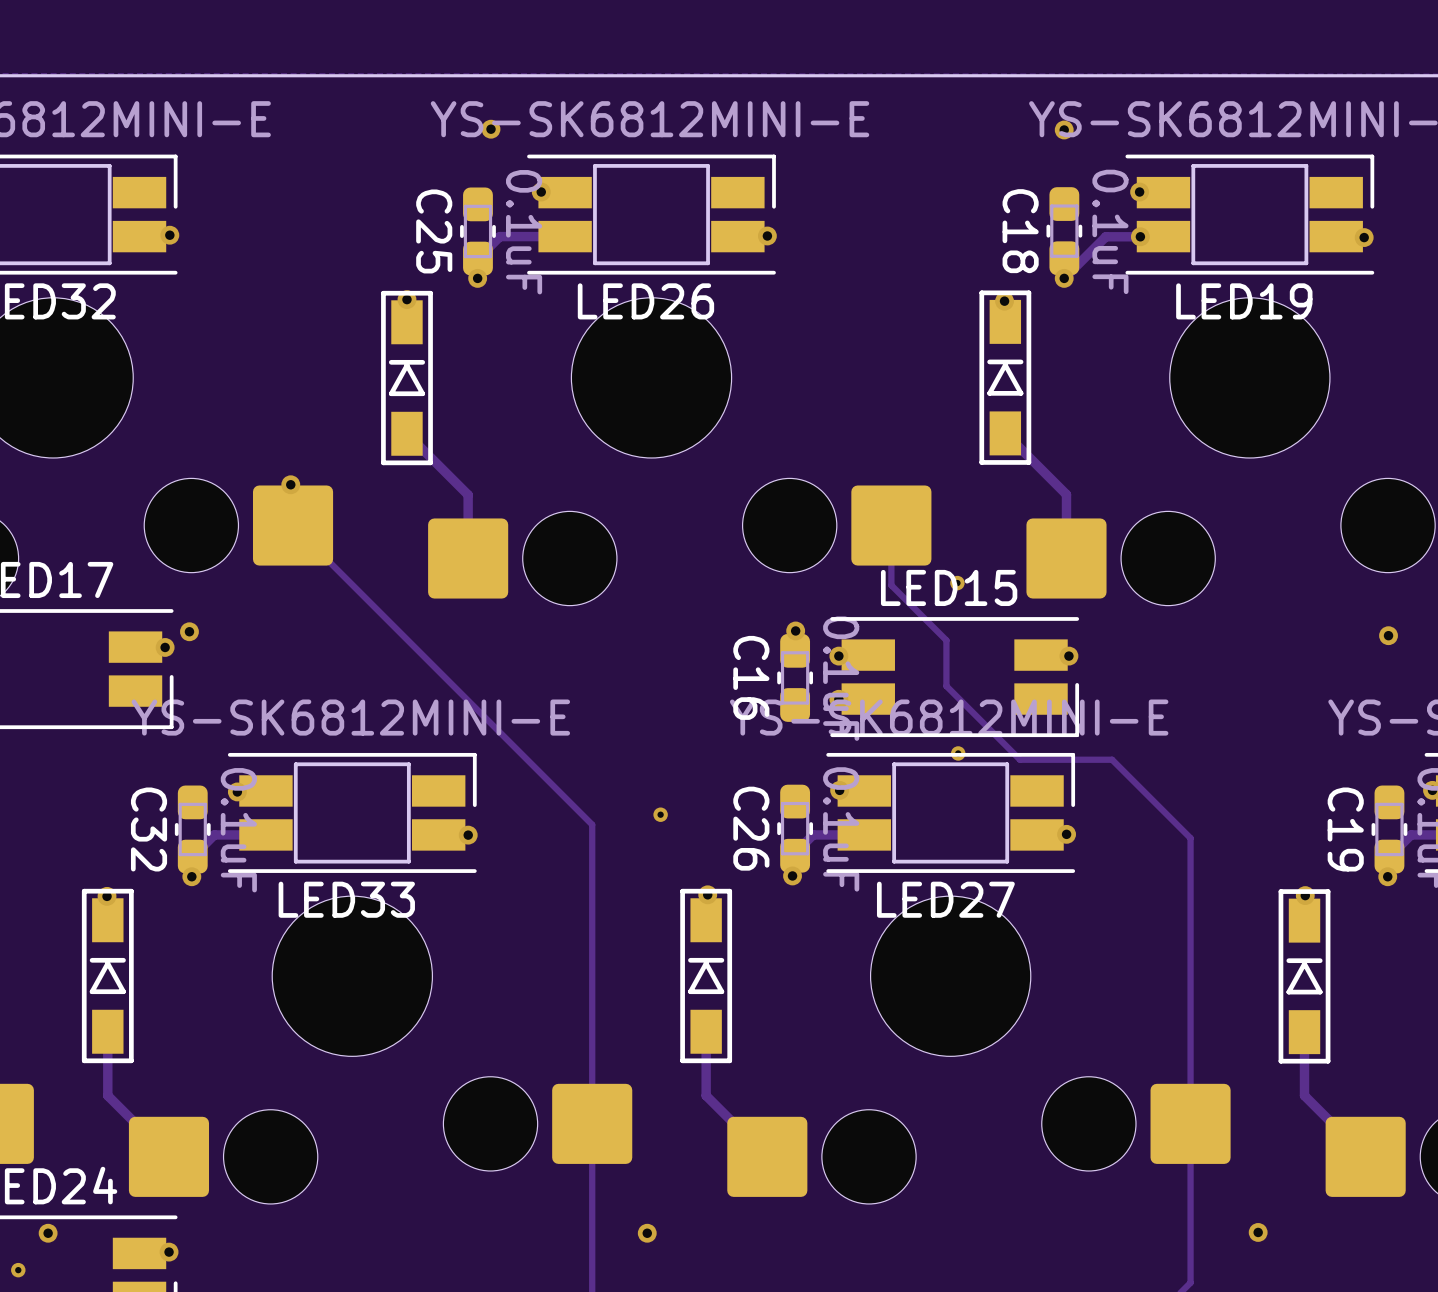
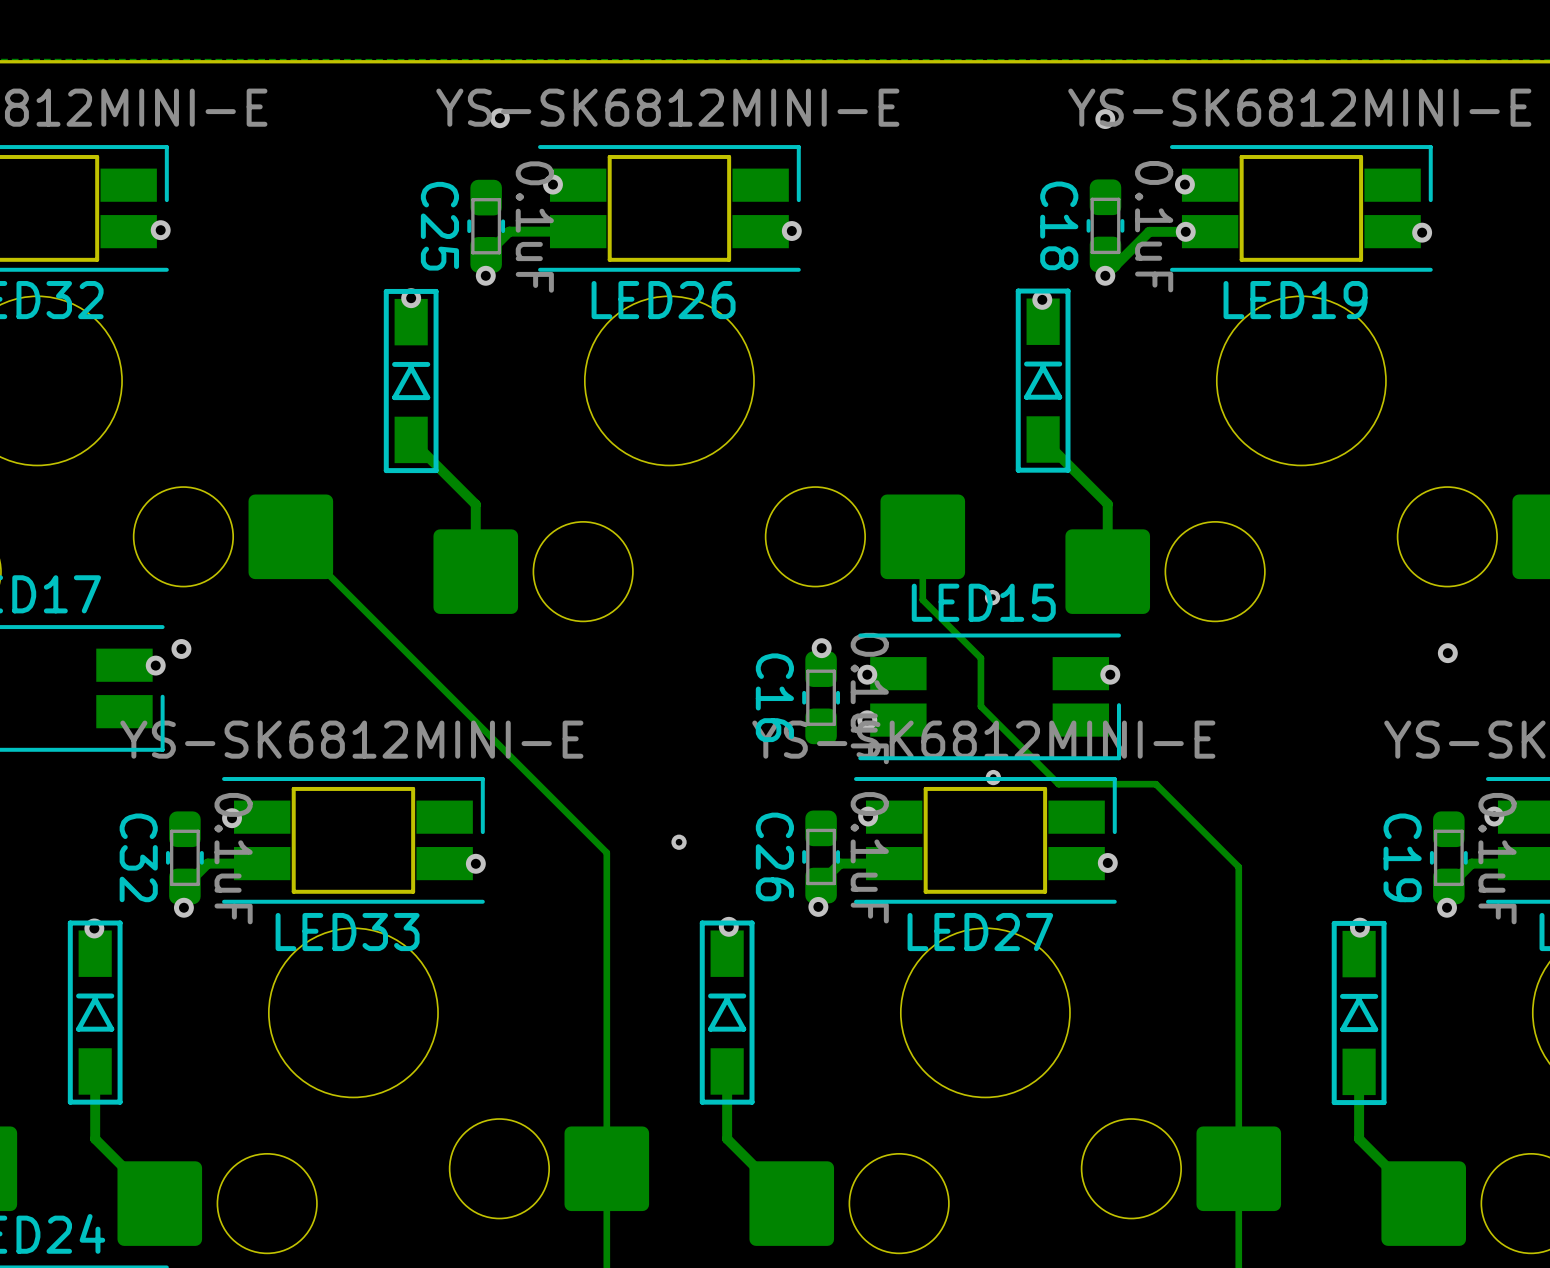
via: (290, 484) -> none

